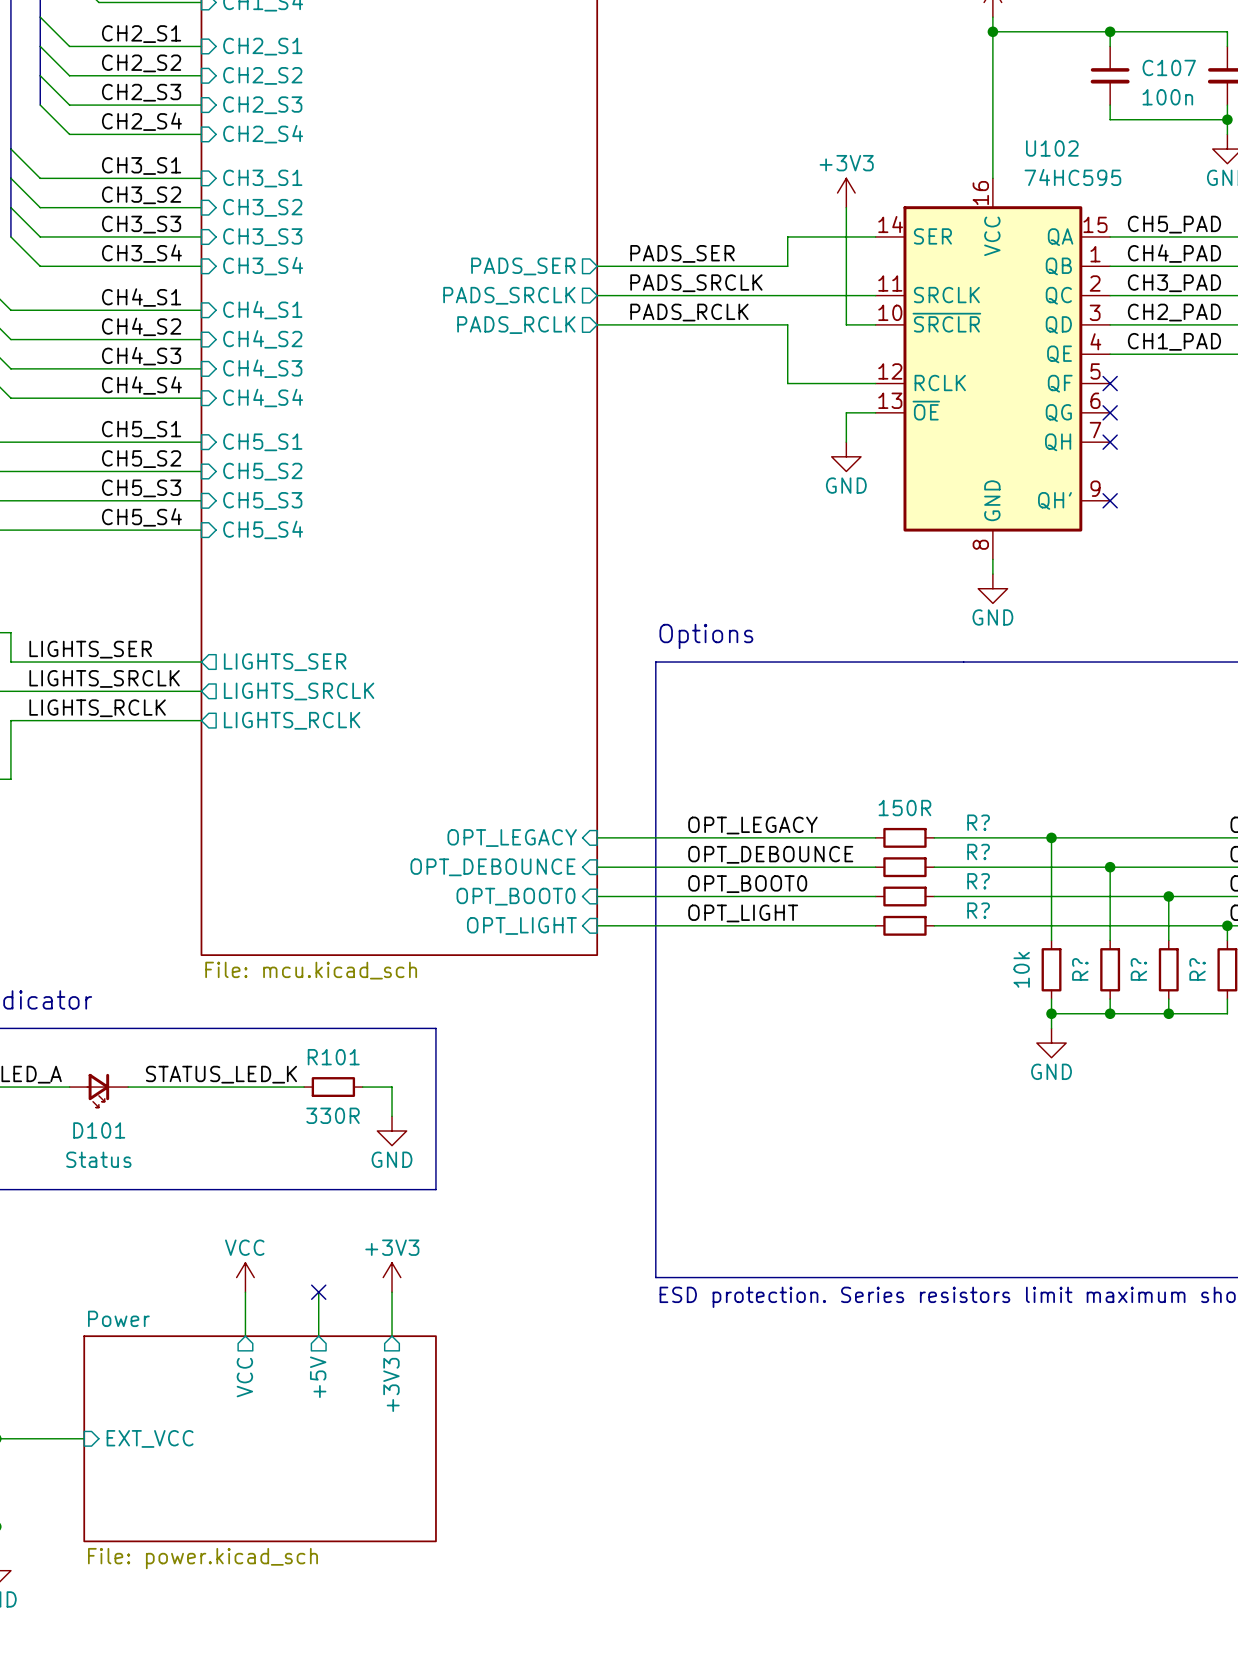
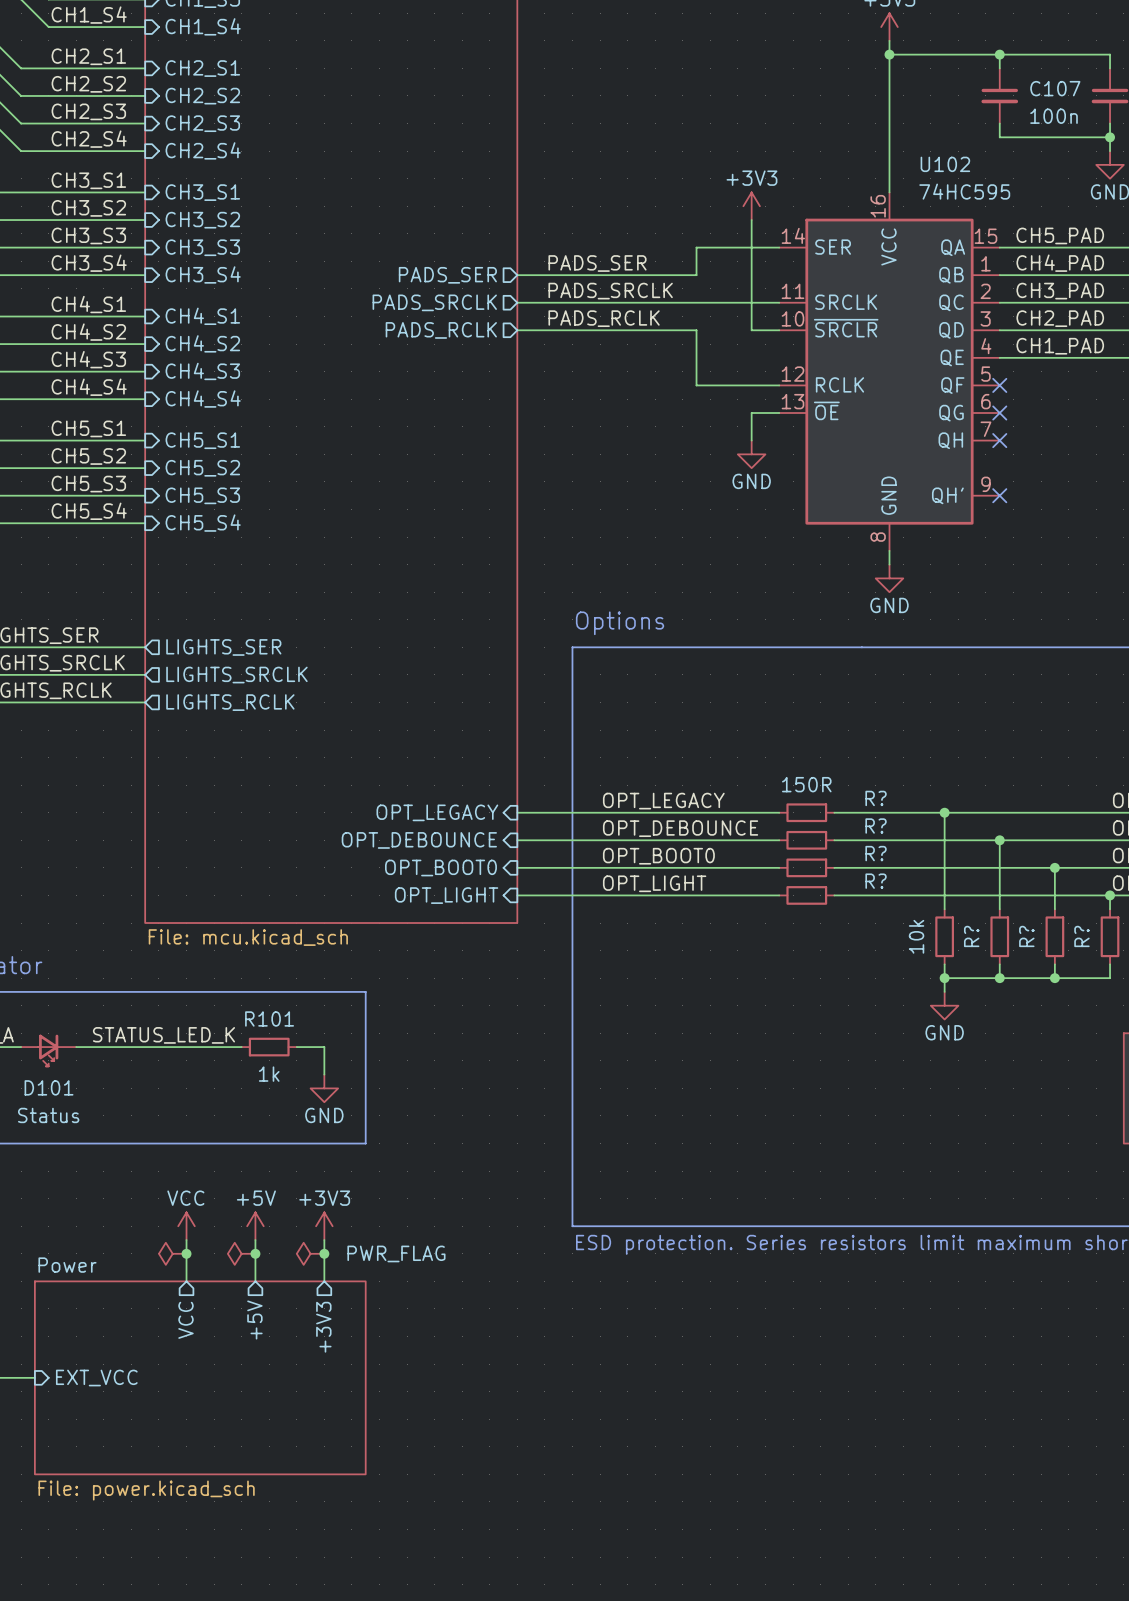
R101 value: 330R (333, 1115) -> 1k (269, 1074)
power symbol: none -> +5V (255, 1226)
no-connect mark: (318, 1292) -> none
power symbol: none -> PWR_FLAG (172, 1253)
junction: none -> (186, 1253)
power symbol: none -> (241, 1253)
junction: none -> (255, 1253)
power symbol: none -> (310, 1253)
junction: none -> (324, 1253)

